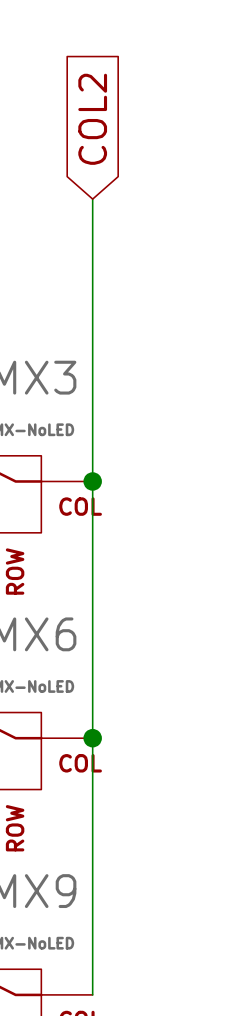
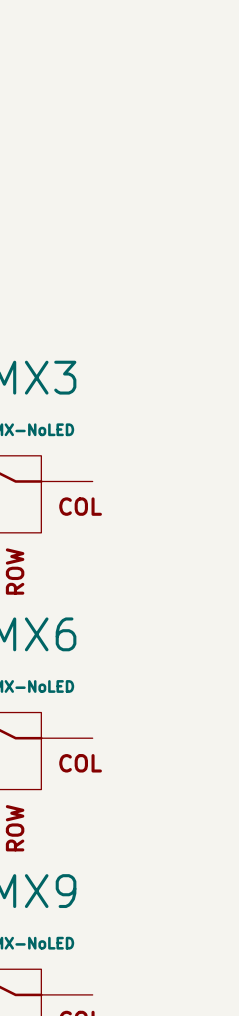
global label: COL2 (92, 119) -> none
wire: (92, 199) (92, 994) -> none
junction: (92, 481) -> none
junction: (92, 738) -> none

